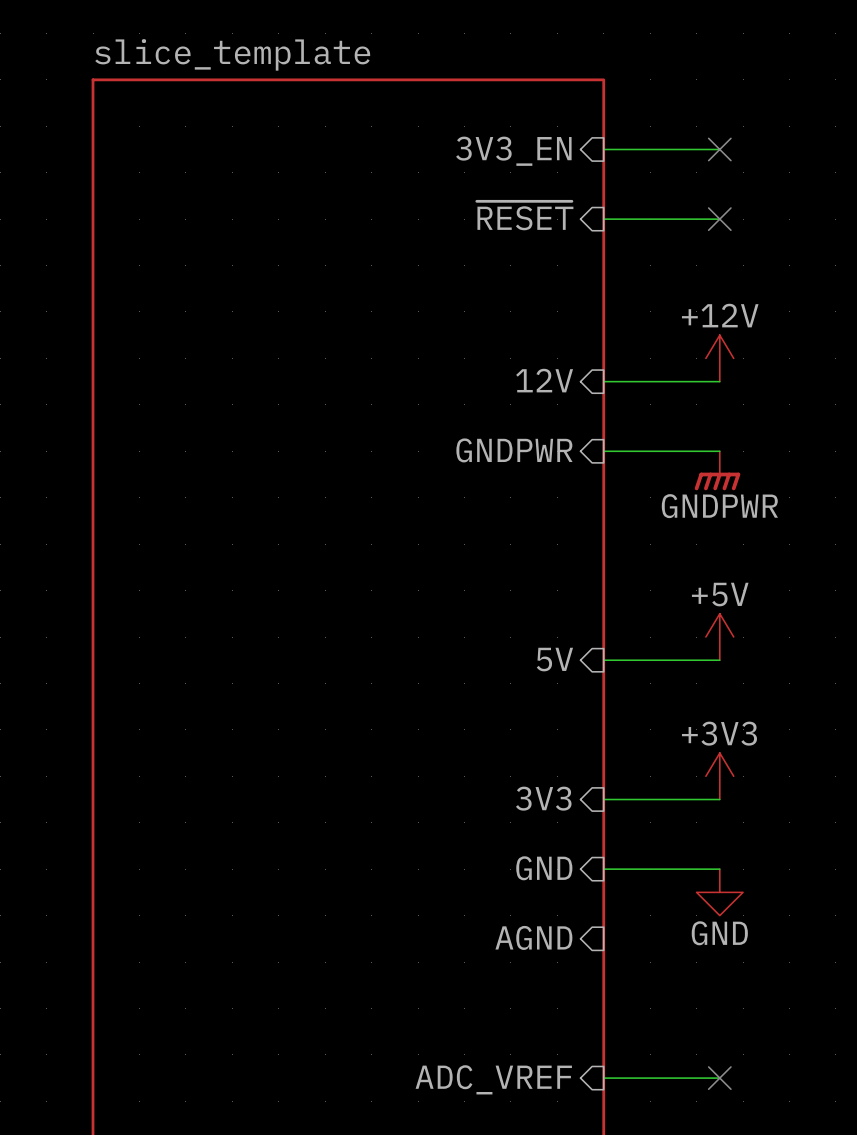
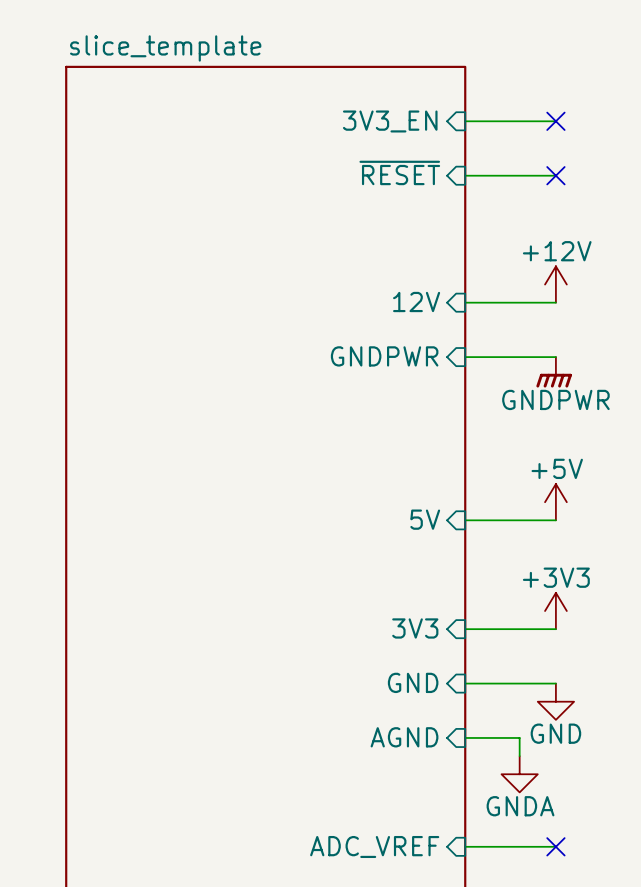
wire: none -> (465, 737) (519, 737) (519, 756)
power symbol: none -> GNDA (519, 774)

